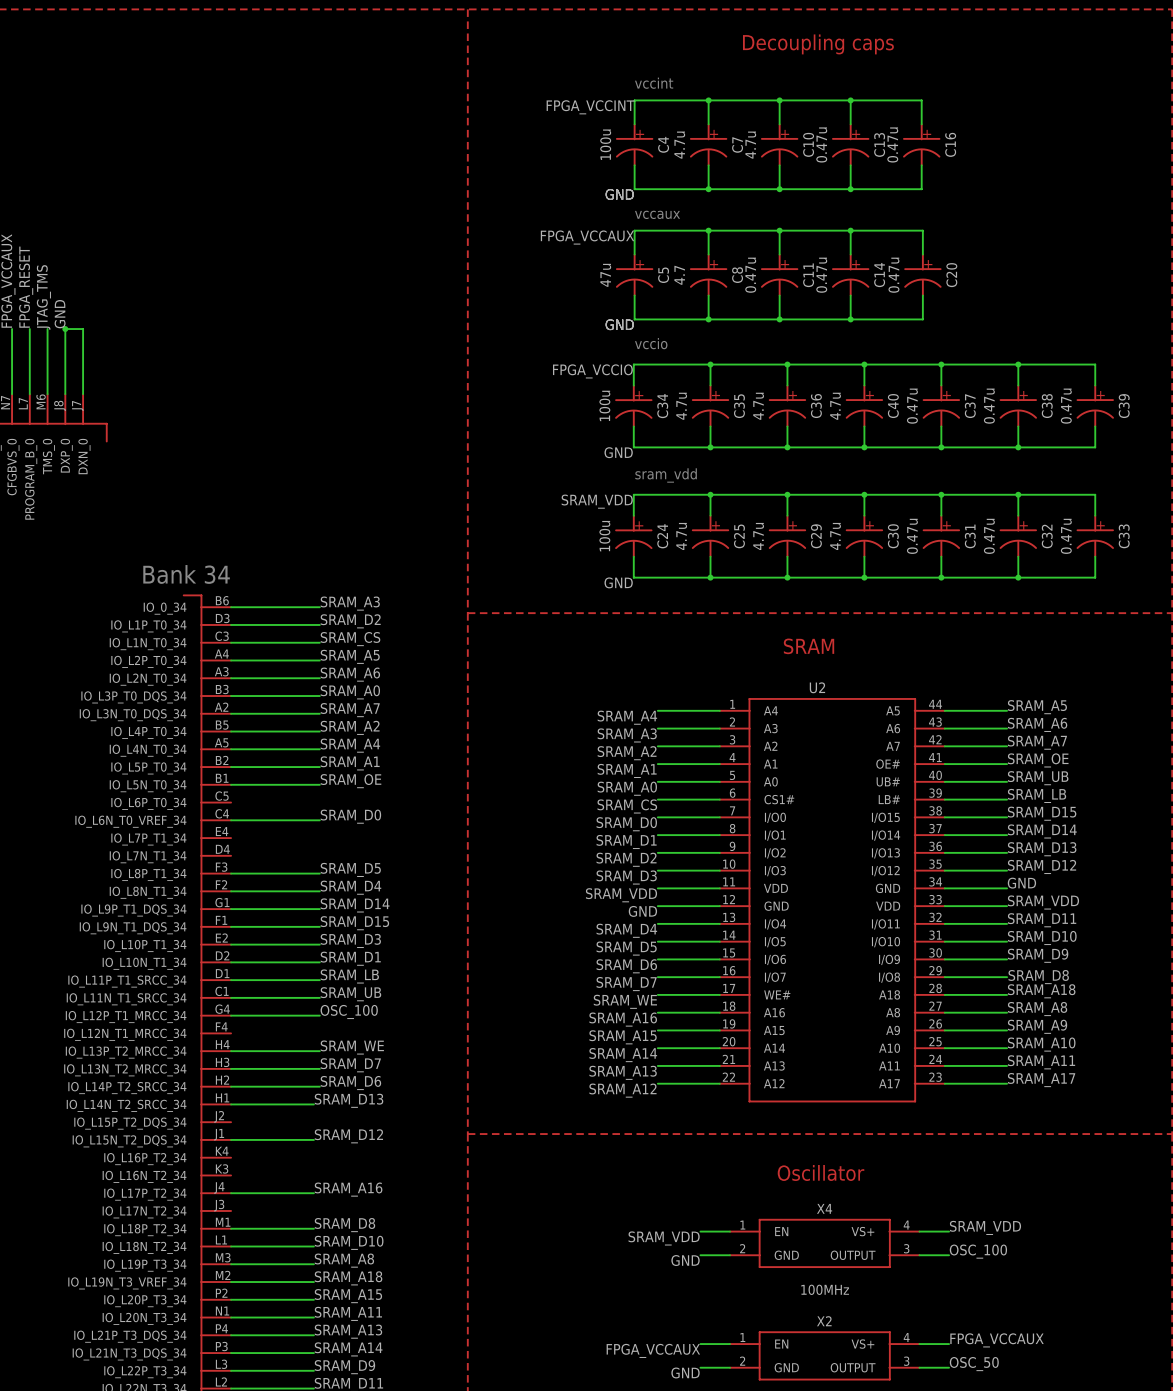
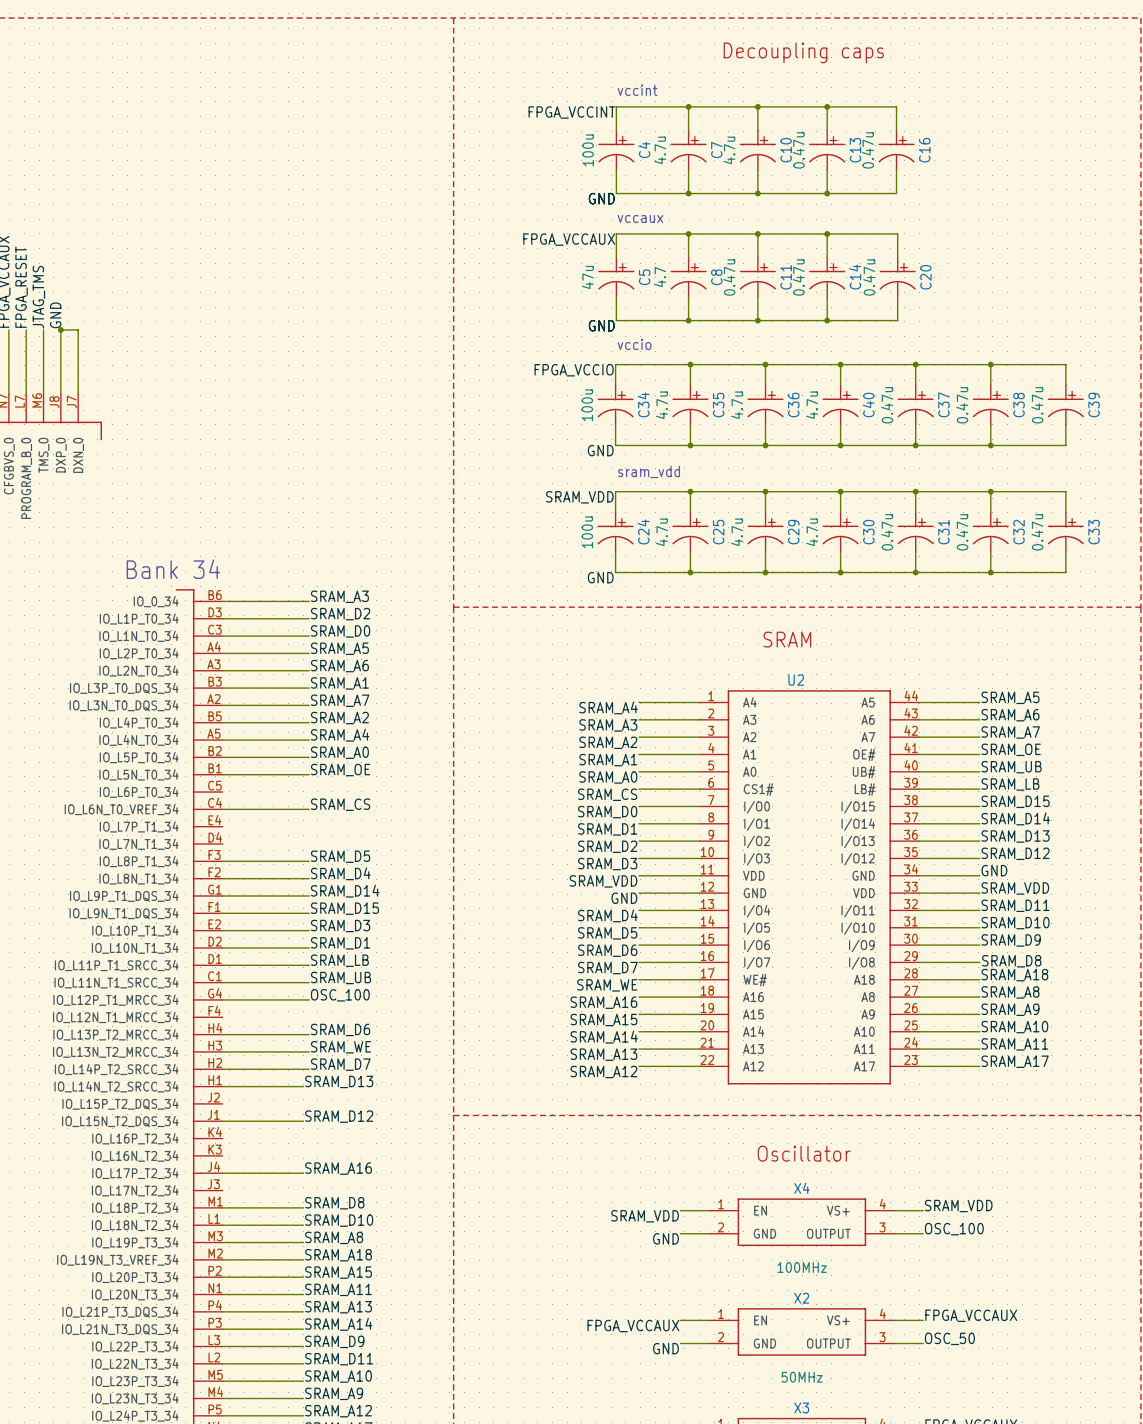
label: SRAM_CS (350, 639) -> SRAM_D0 (340, 631)
label: SRAM_A0 (350, 692) -> SRAM_A1 (339, 683)
label: SRAM_A1 (350, 763) -> SRAM_A0 (339, 752)
label: SRAM_D0 (350, 816) -> SRAM_CS (340, 804)
label: SRAM_WE (352, 1047) -> SRAM_D6 (340, 1029)
label: SRAM_D7 (350, 1065) -> SRAM_WE (341, 1047)
label: SRAM_D6 (350, 1083) -> SRAM_D7 (340, 1064)

